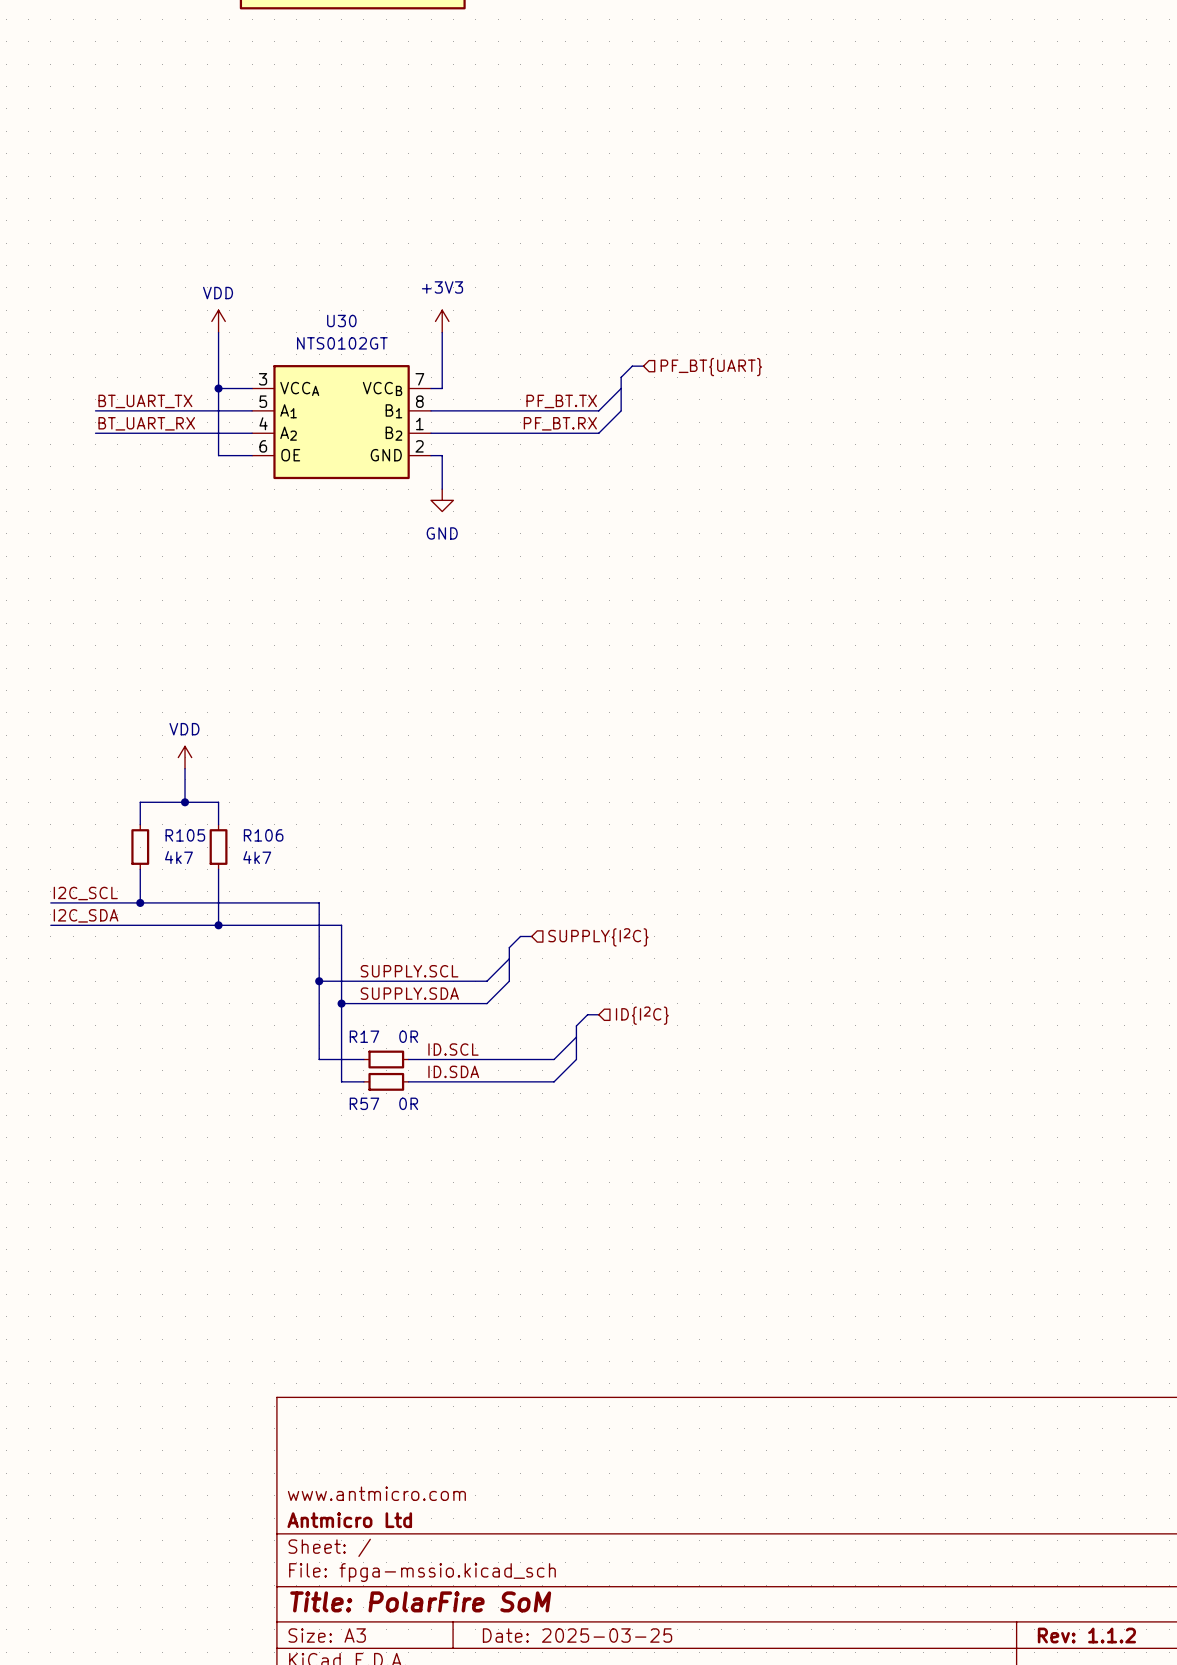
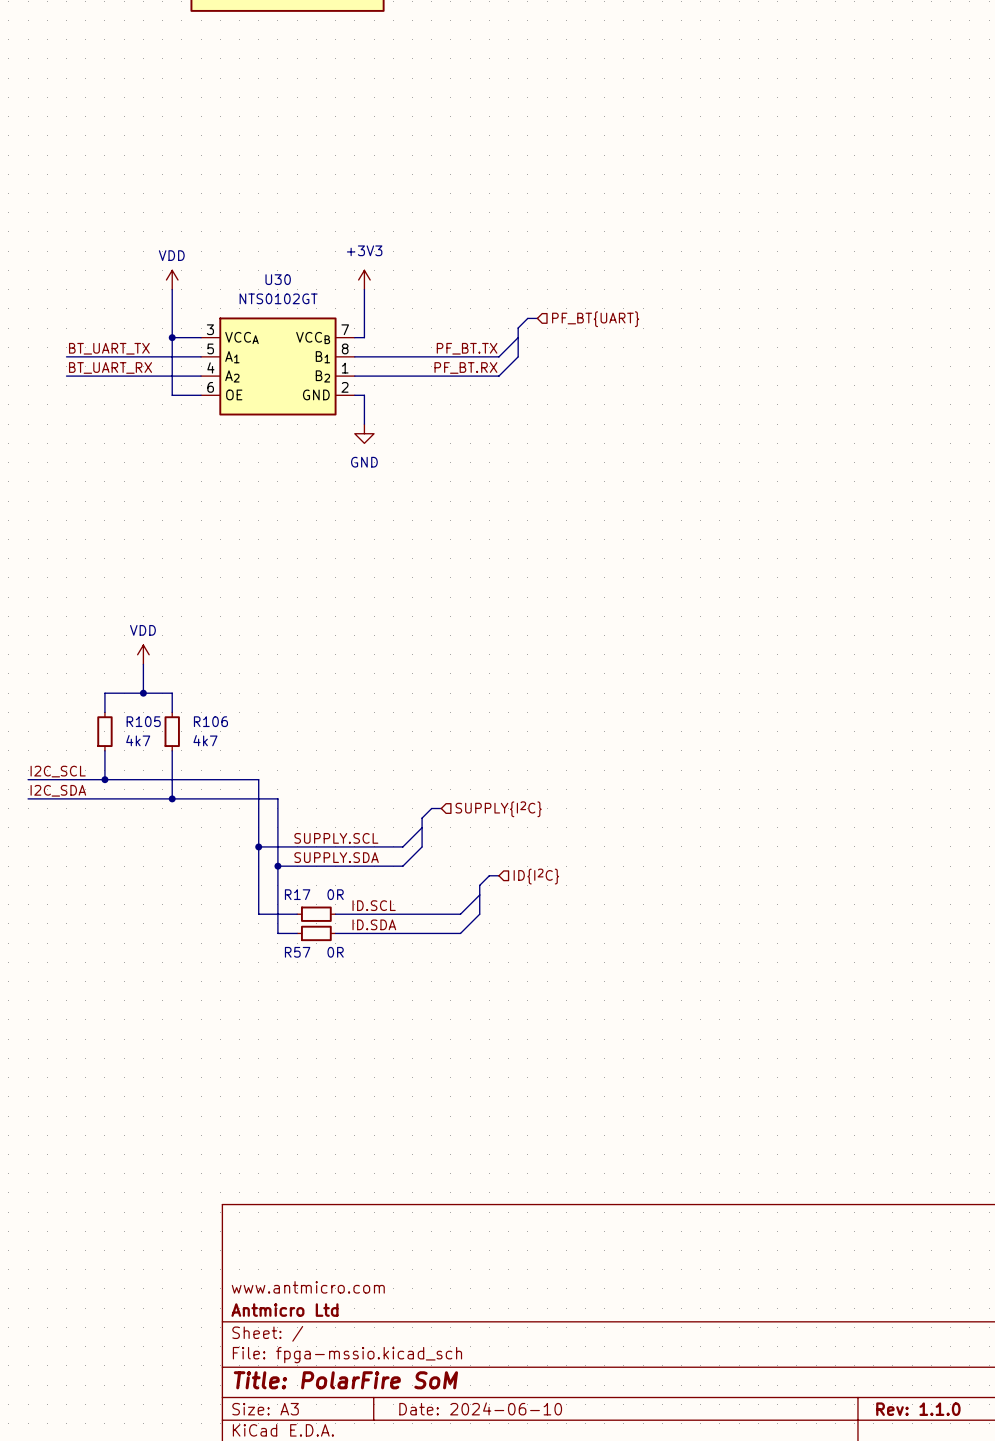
title block: Date: 2025-03-25 (577, 1635) -> Date: 2024-06-10 (480, 1408)
title block: Rev: 1.1.2 (1086, 1635) -> Rev: 1.1.0 (918, 1409)

